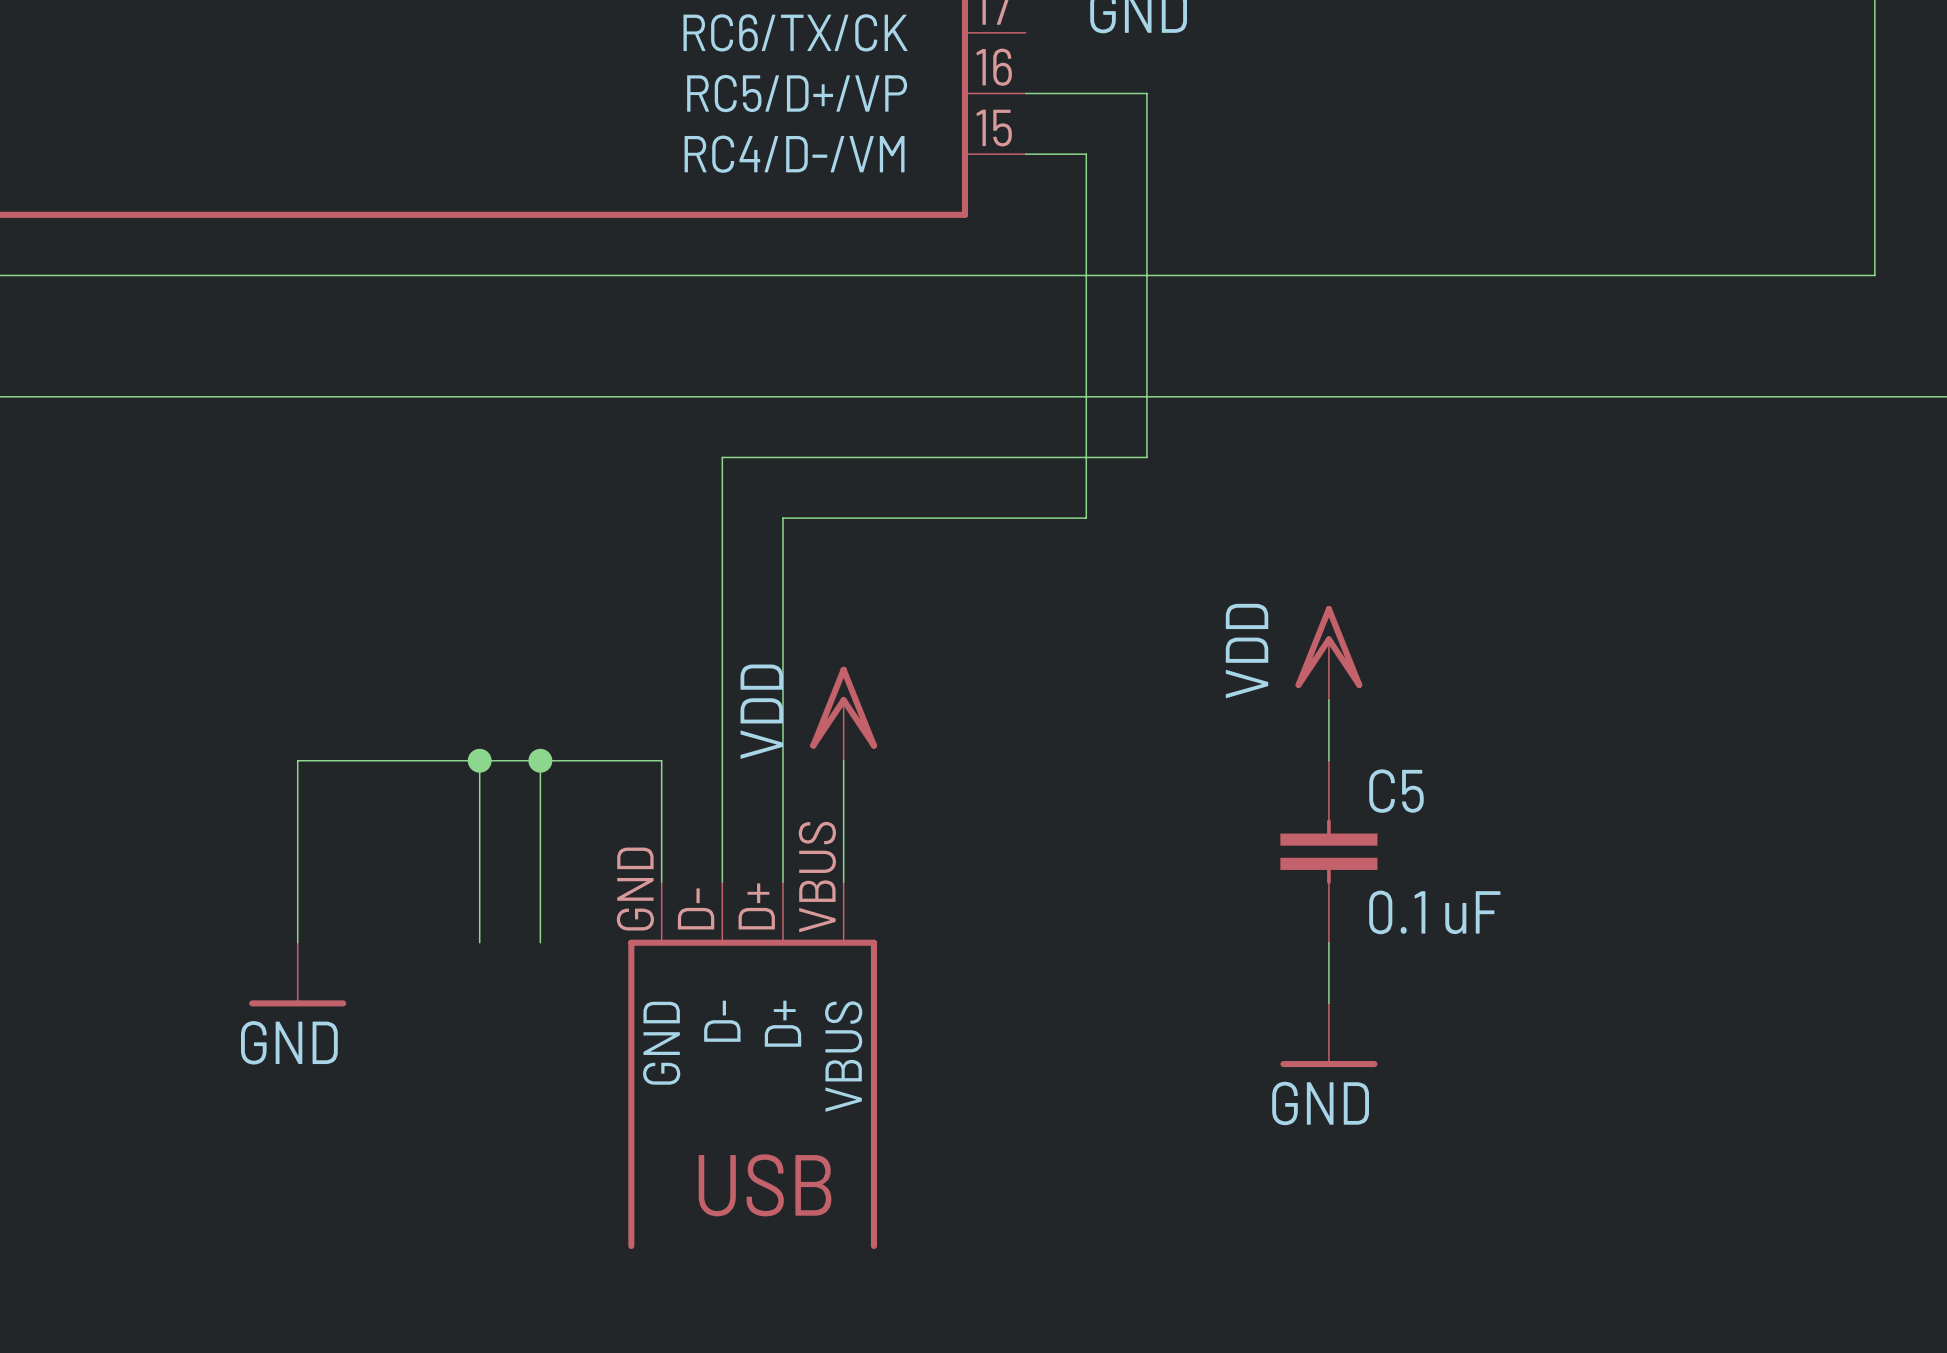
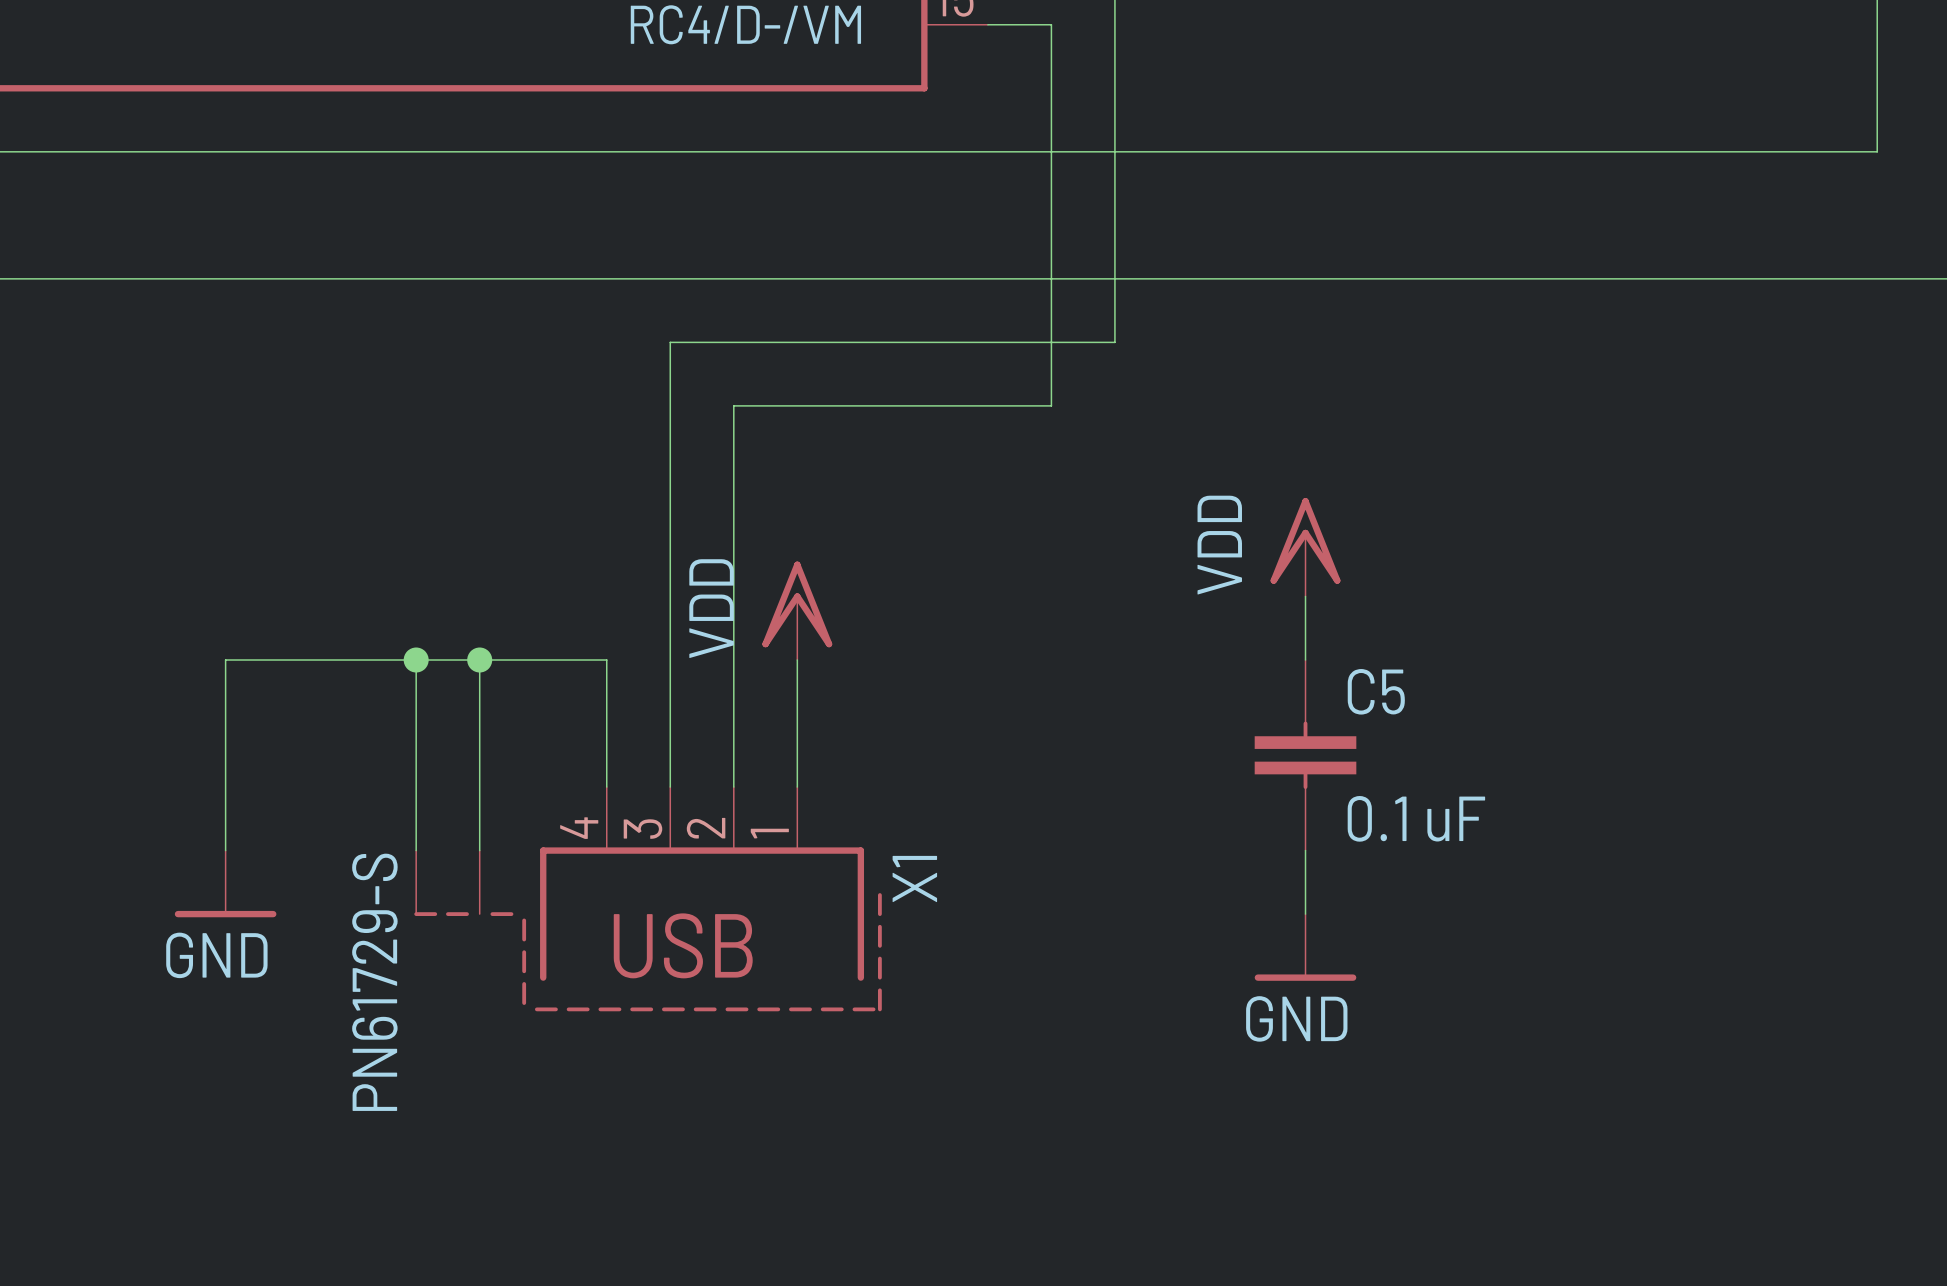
X1: none -> PN61729-S (648, 899)
part: (752, 1065) -> none

